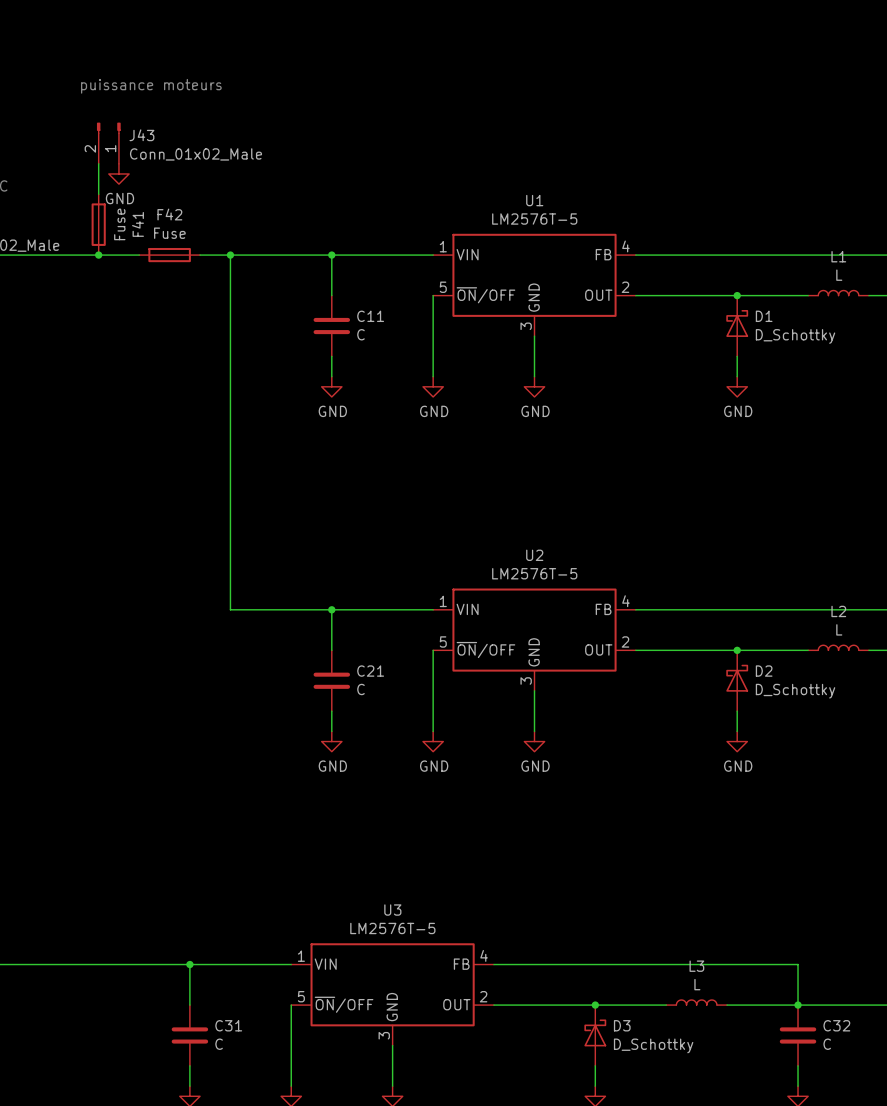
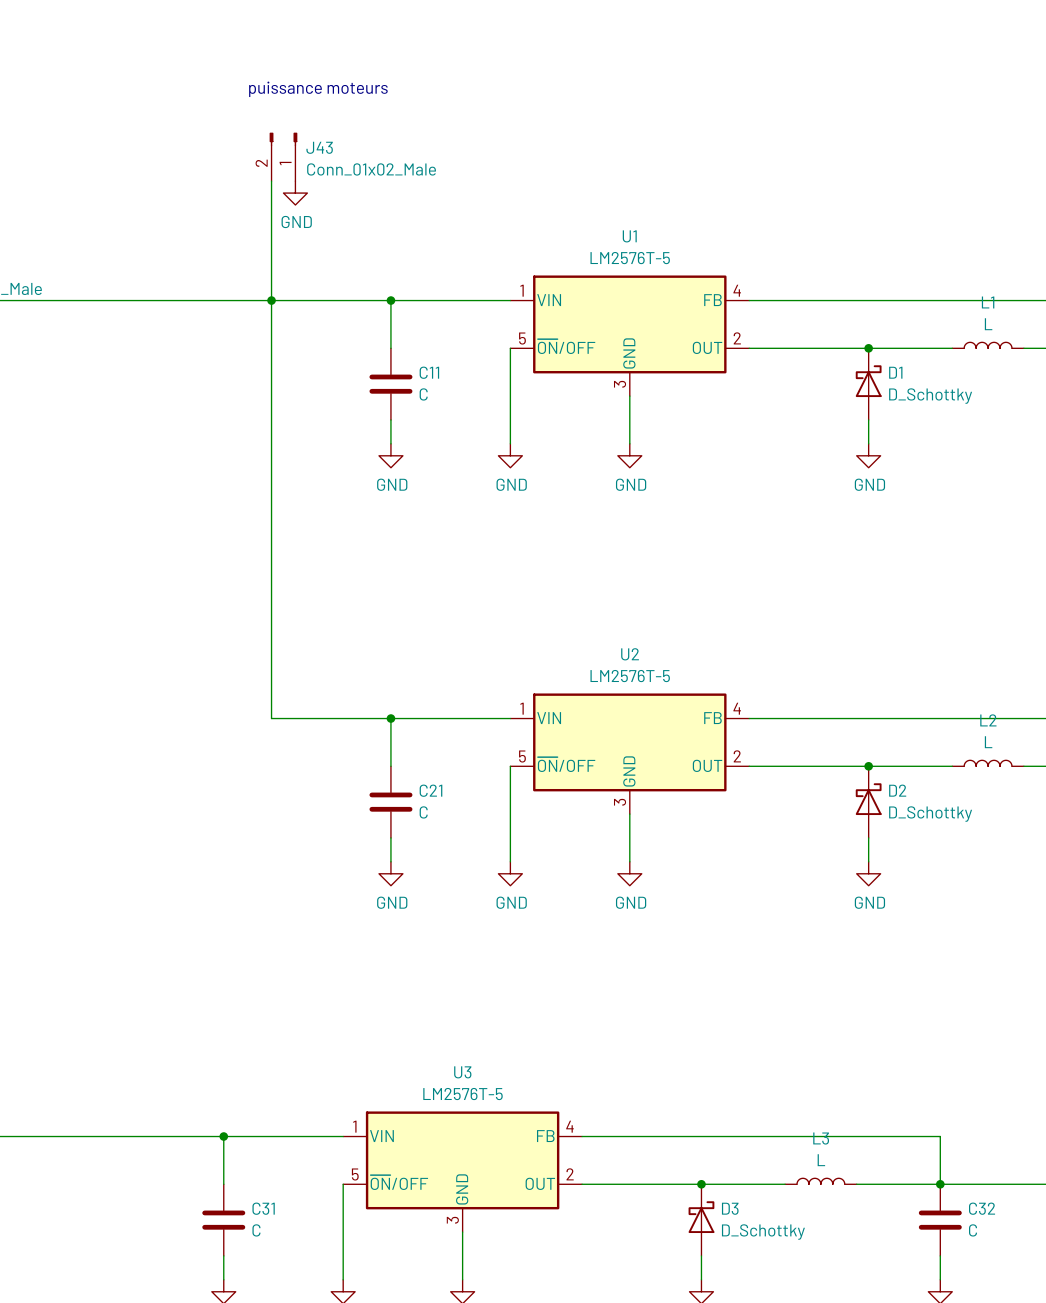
text position: puissance moteurs (151, 86) -> puissance moteurs (318, 89)
J43 position: (108, 143) -> (283, 156)
wire: none -> (271, 181) (271, 300)
wire: (98, 163) (98, 194) -> none
power symbol position: GND (118, 173) -> GND (295, 193)
F41: Fuse (98, 224) -> none
junction: (98, 255) -> none
F42: Fuse (169, 255) -> none

